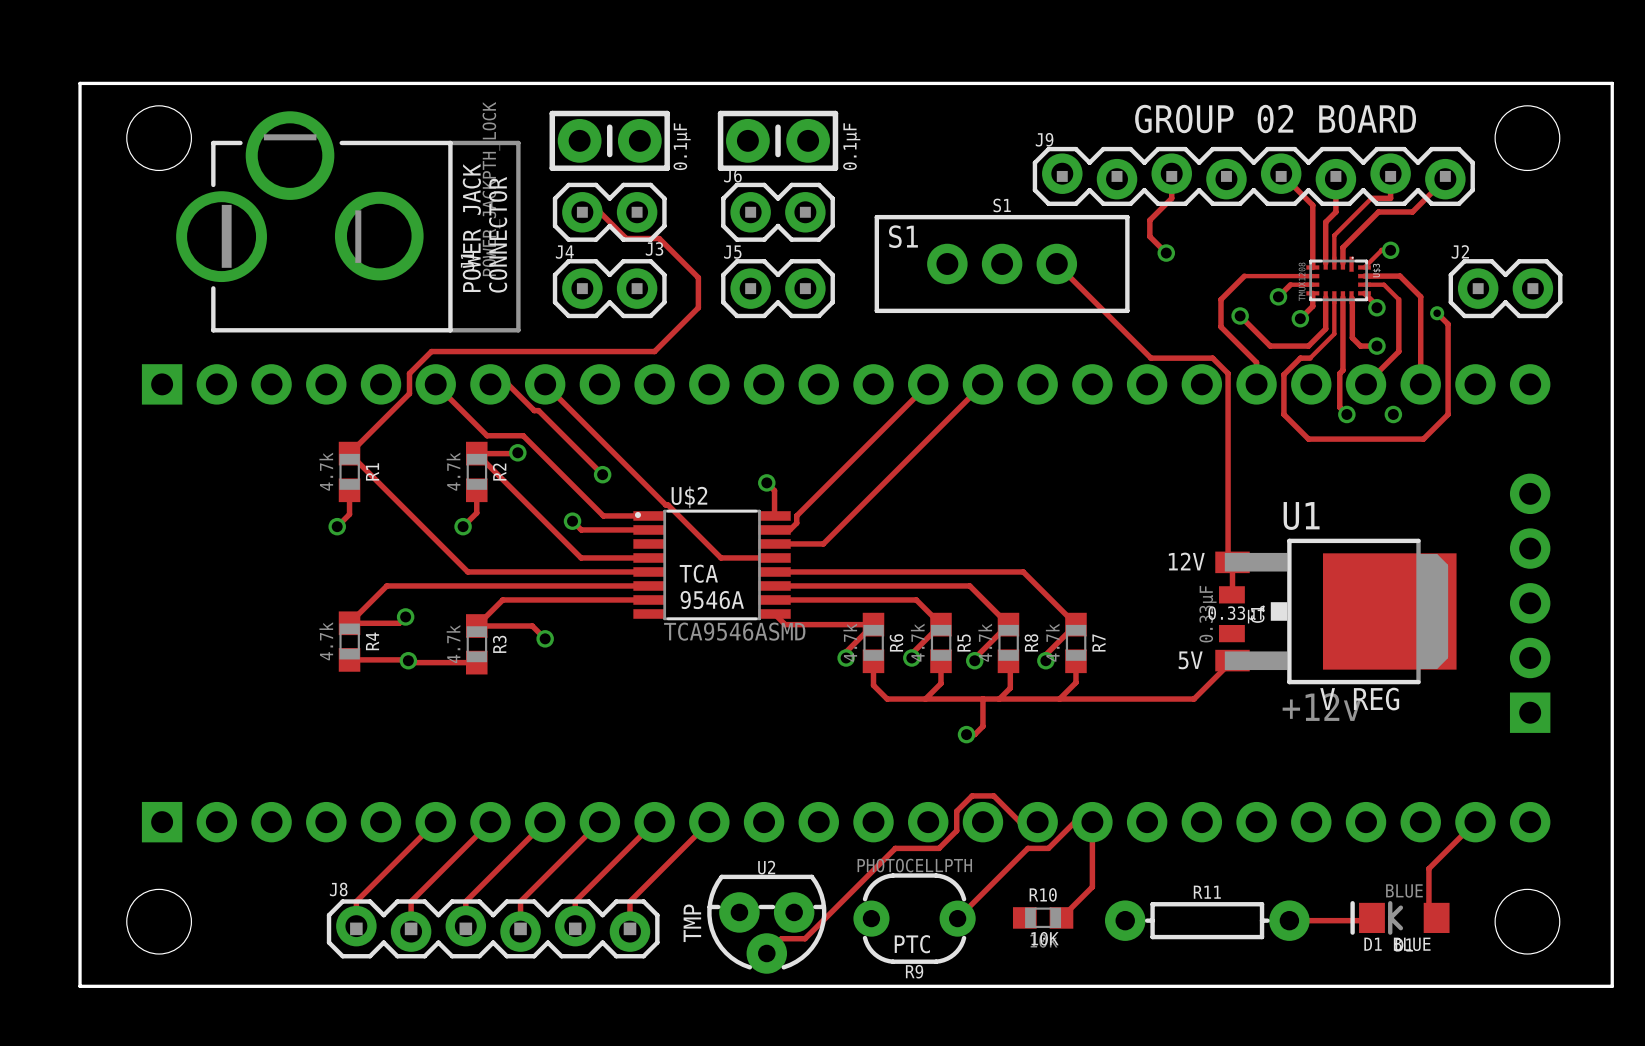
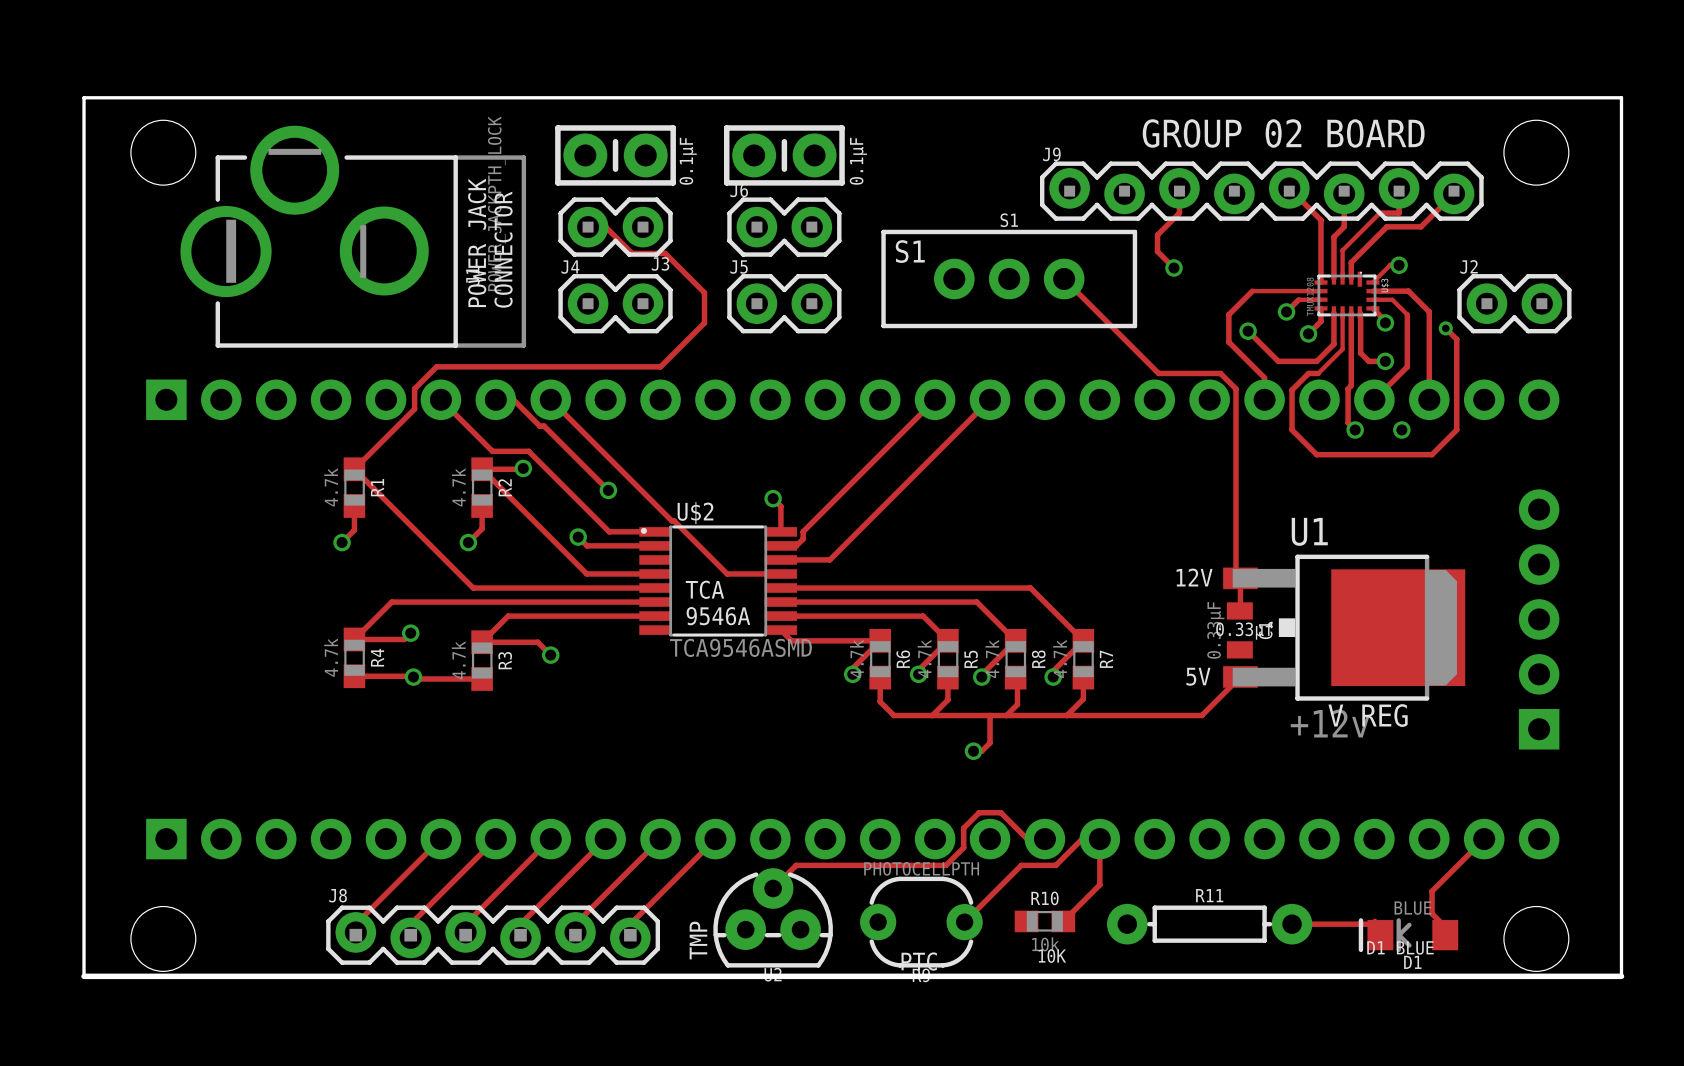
track: (895, 848) (805, 938) (781, 938) (766, 953) -> (902, 865) (796, 865) (773, 888)
track: (1027, 848) (957, 918) -> (1035, 865) (1021, 865) (964, 922)
track: (1092, 867) (1092, 886) (1061, 917) -> (1099, 884) (1063, 921)
track: (1428, 868) (1428, 910) (1436, 917) -> (1437, 885) (1432, 891) (1432, 913) (1439, 921)
R10 position: (1043, 917) -> (1044, 921)
track: (1371, 917) (1369, 920) (1289, 920) -> (1374, 921) (1372, 924) (1292, 924)
R9 position: (914, 918) -> (921, 922)
R11 position: (1207, 920) -> (1209, 924)
U2 rotation: 0° (766, 924) -> 180° (773, 917)
J8 position: (493, 928) -> (493, 935)
text position: D1 BLUE (1397, 944) -> D1 BLUE (1400, 947)
board edge: (80, 958) (80, 986) (1612, 986) (1612, 958) -> (84, 976) (1621, 976)

